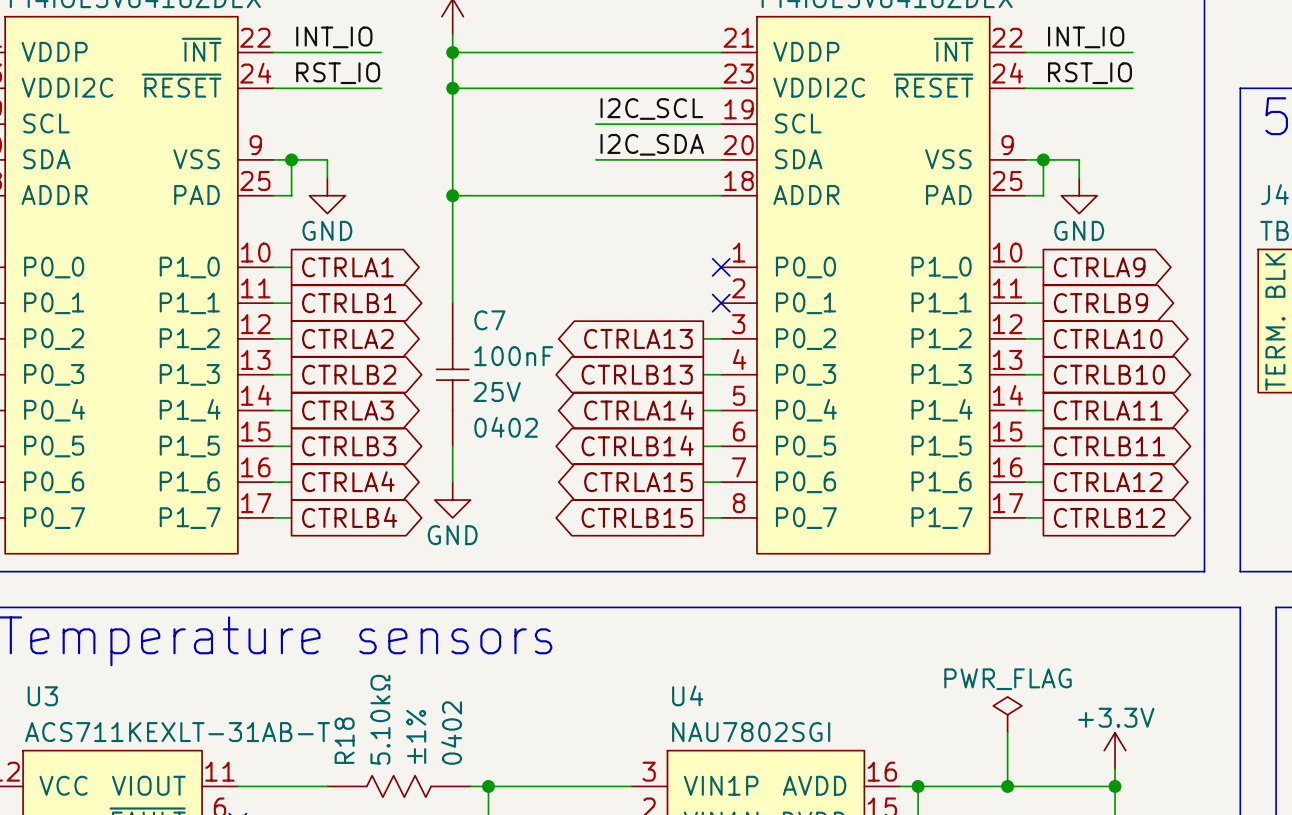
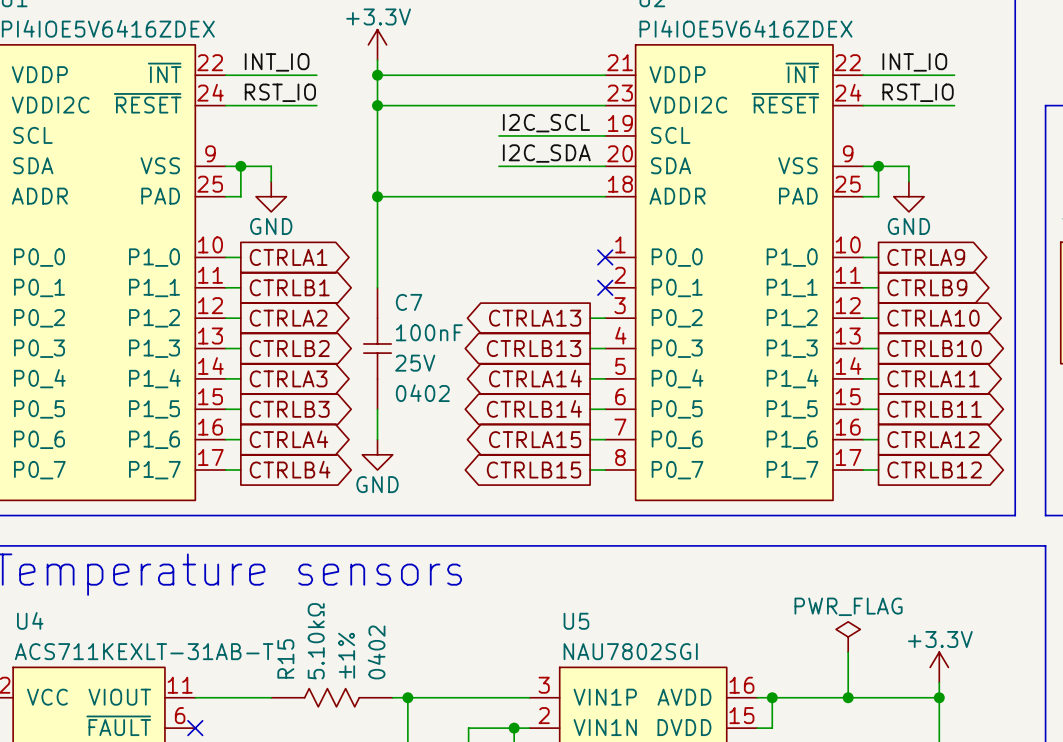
U4 name: U4 (687, 695) -> U5 (576, 621)
U3 name: U3 (42, 696) -> U4 (30, 620)
R18 name: R18 (344, 740) -> R15 (285, 658)

